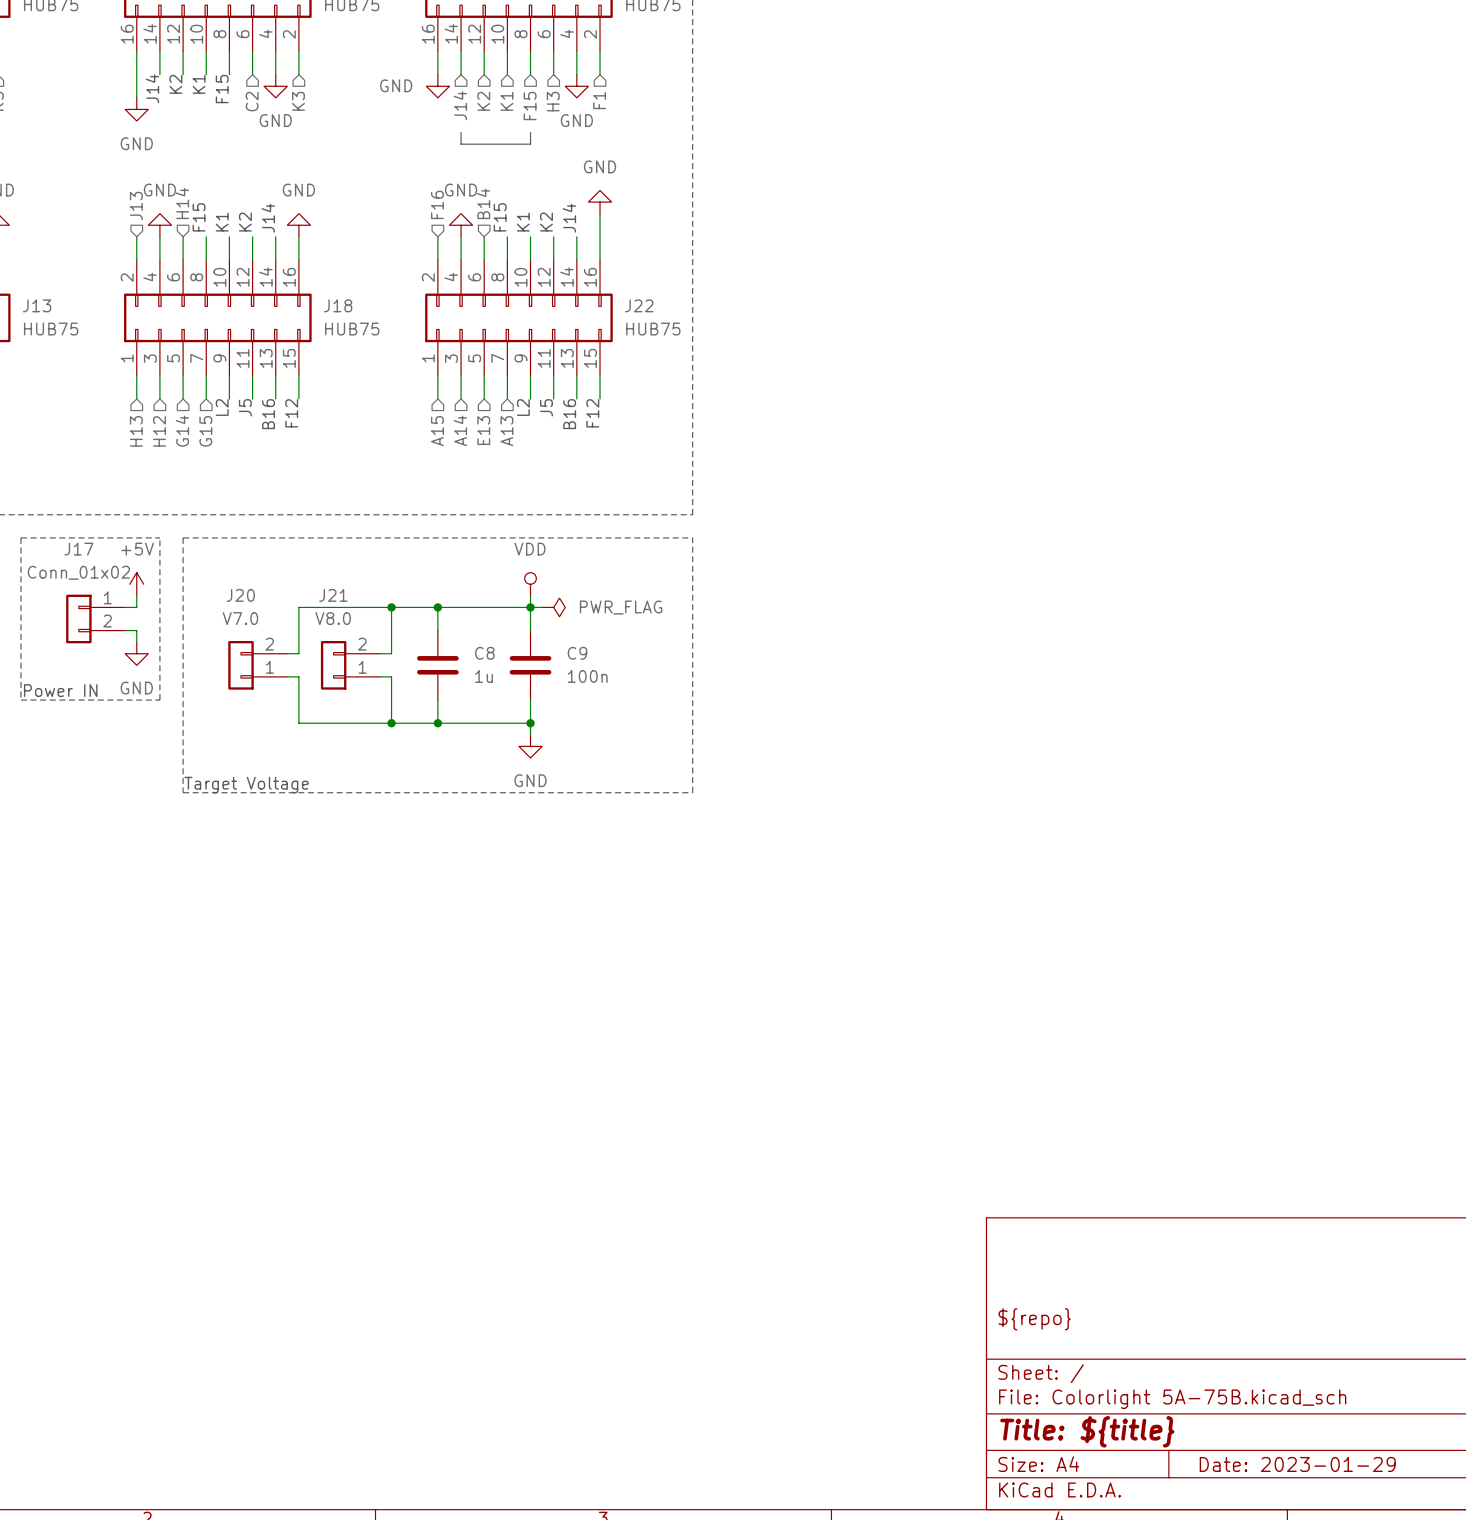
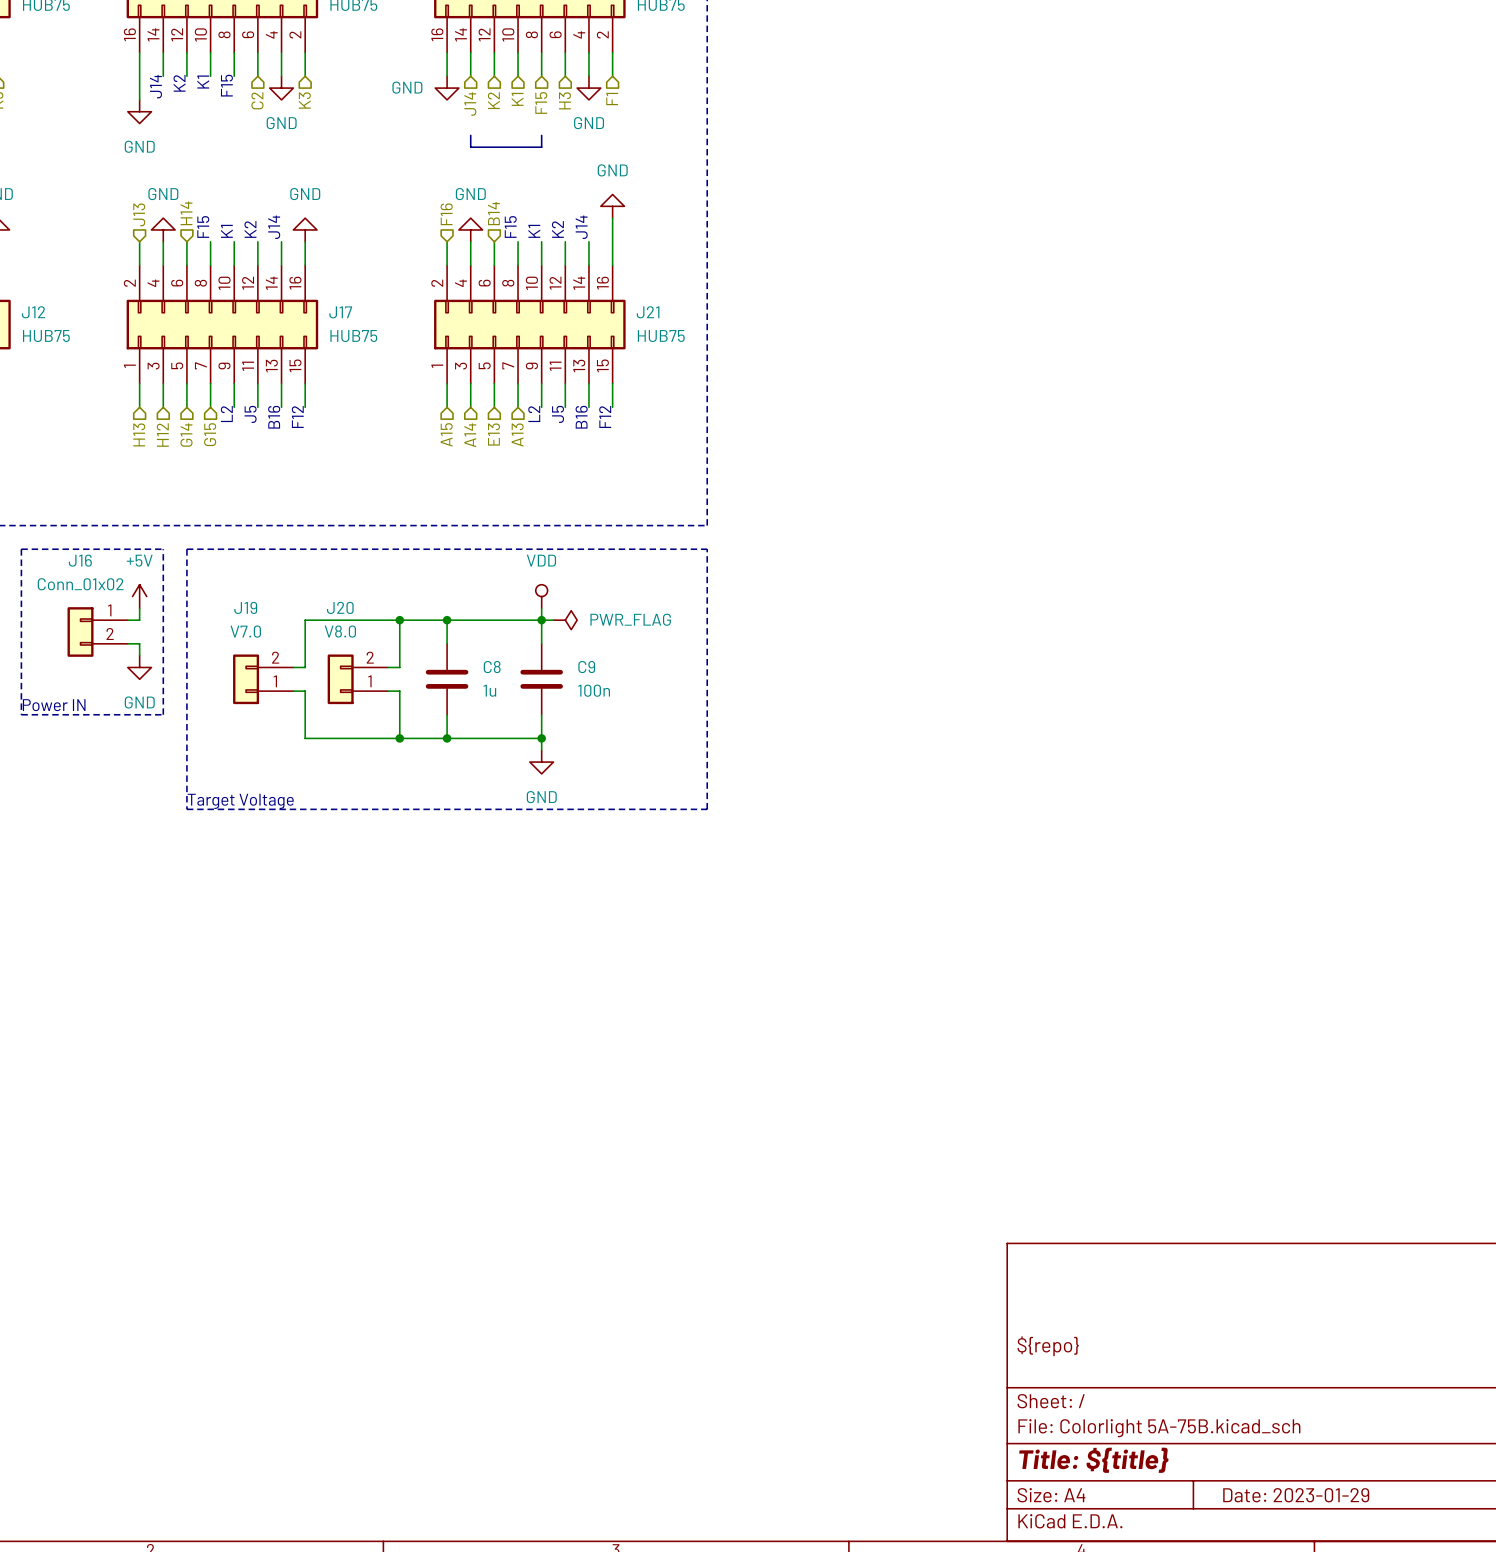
J13 name: J13 (37, 305) -> J12 (33, 312)
J18 name: J18 (338, 305) -> J17 (340, 312)
J22 name: J22 (639, 305) -> J21 (648, 312)
J17 name: J17 (78, 549) -> J16 (80, 560)
J20 name: J20 (240, 595) -> J19 (245, 607)
J21 name: J21 (333, 595) -> J20 (340, 607)

